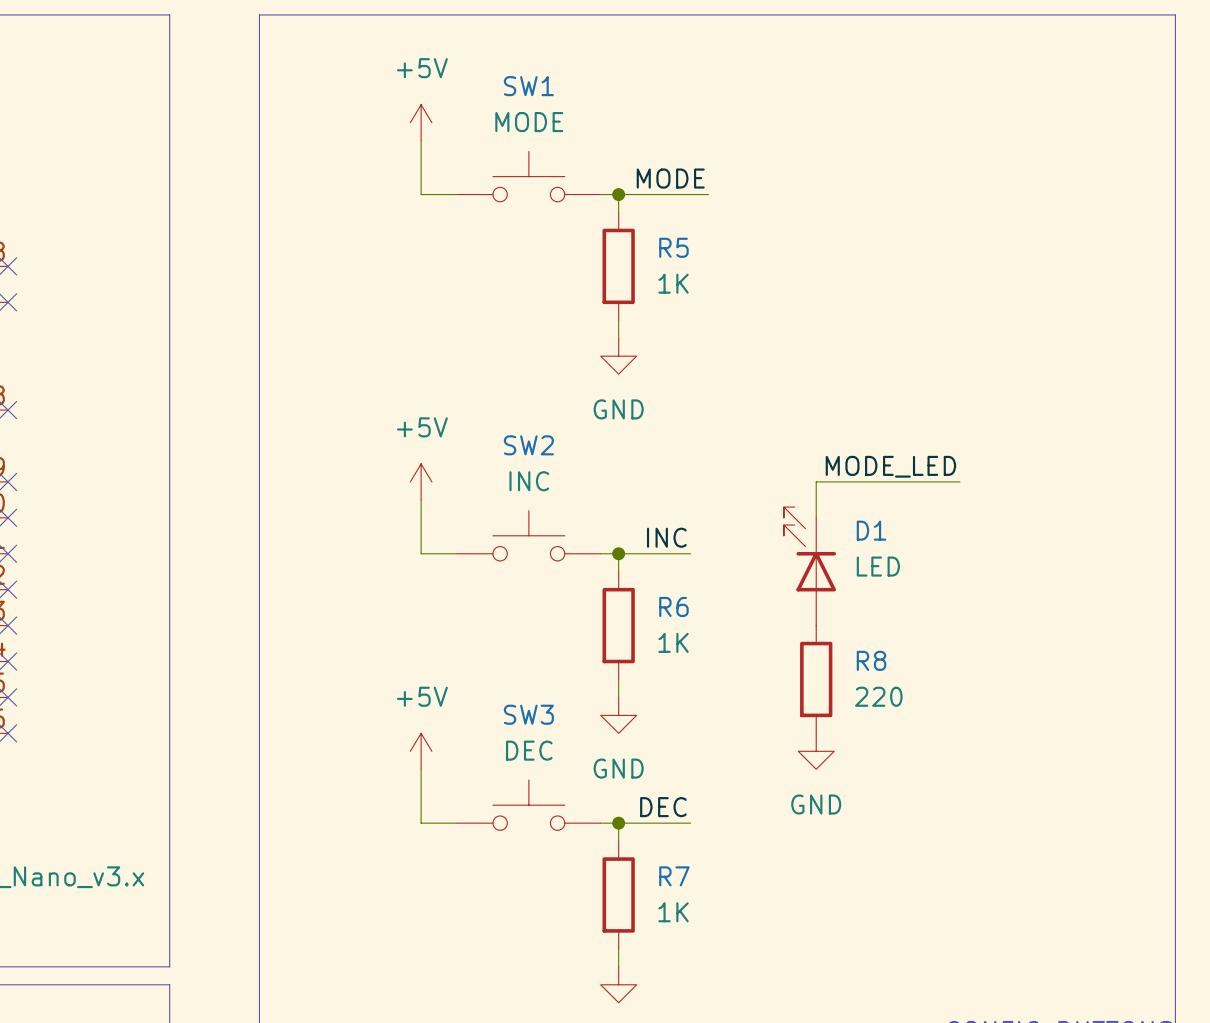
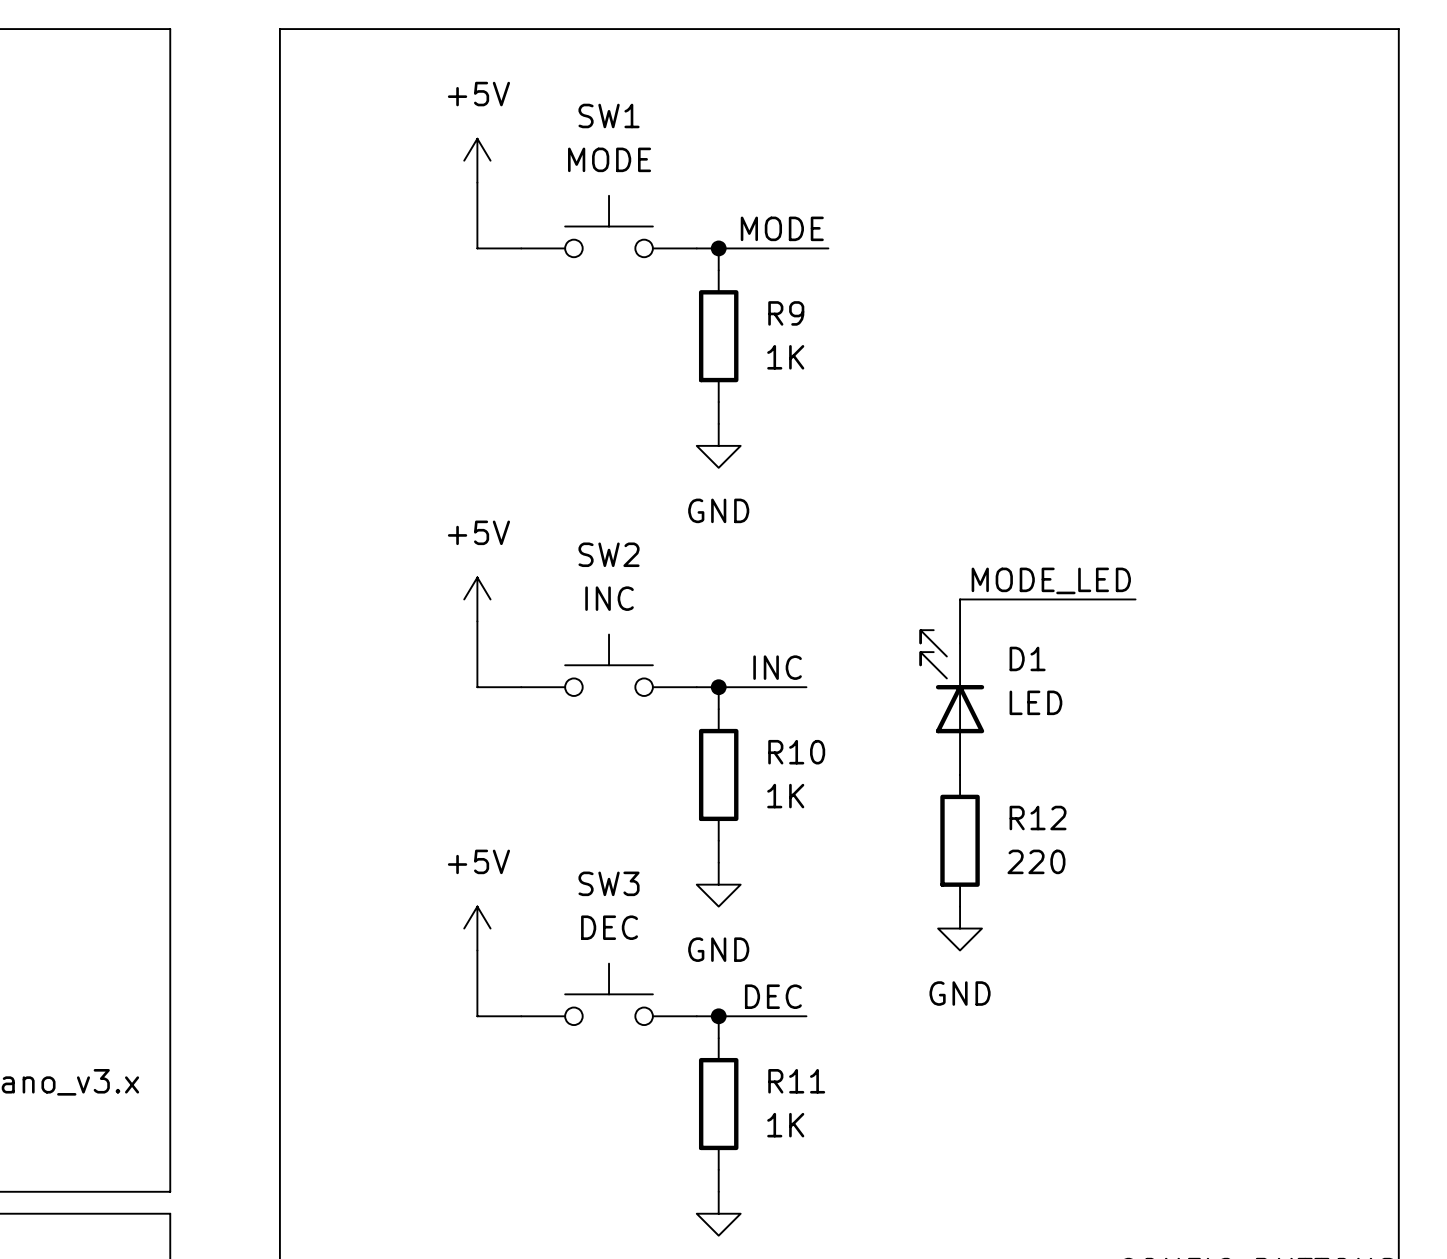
R5 name: R5 (673, 247) -> R9 (786, 313)
R6 name: R6 (673, 606) -> R10 (796, 752)
R8 name: R8 (871, 660) -> R12 (1038, 818)
R7 name: R7 (674, 876) -> R11 (796, 1081)

